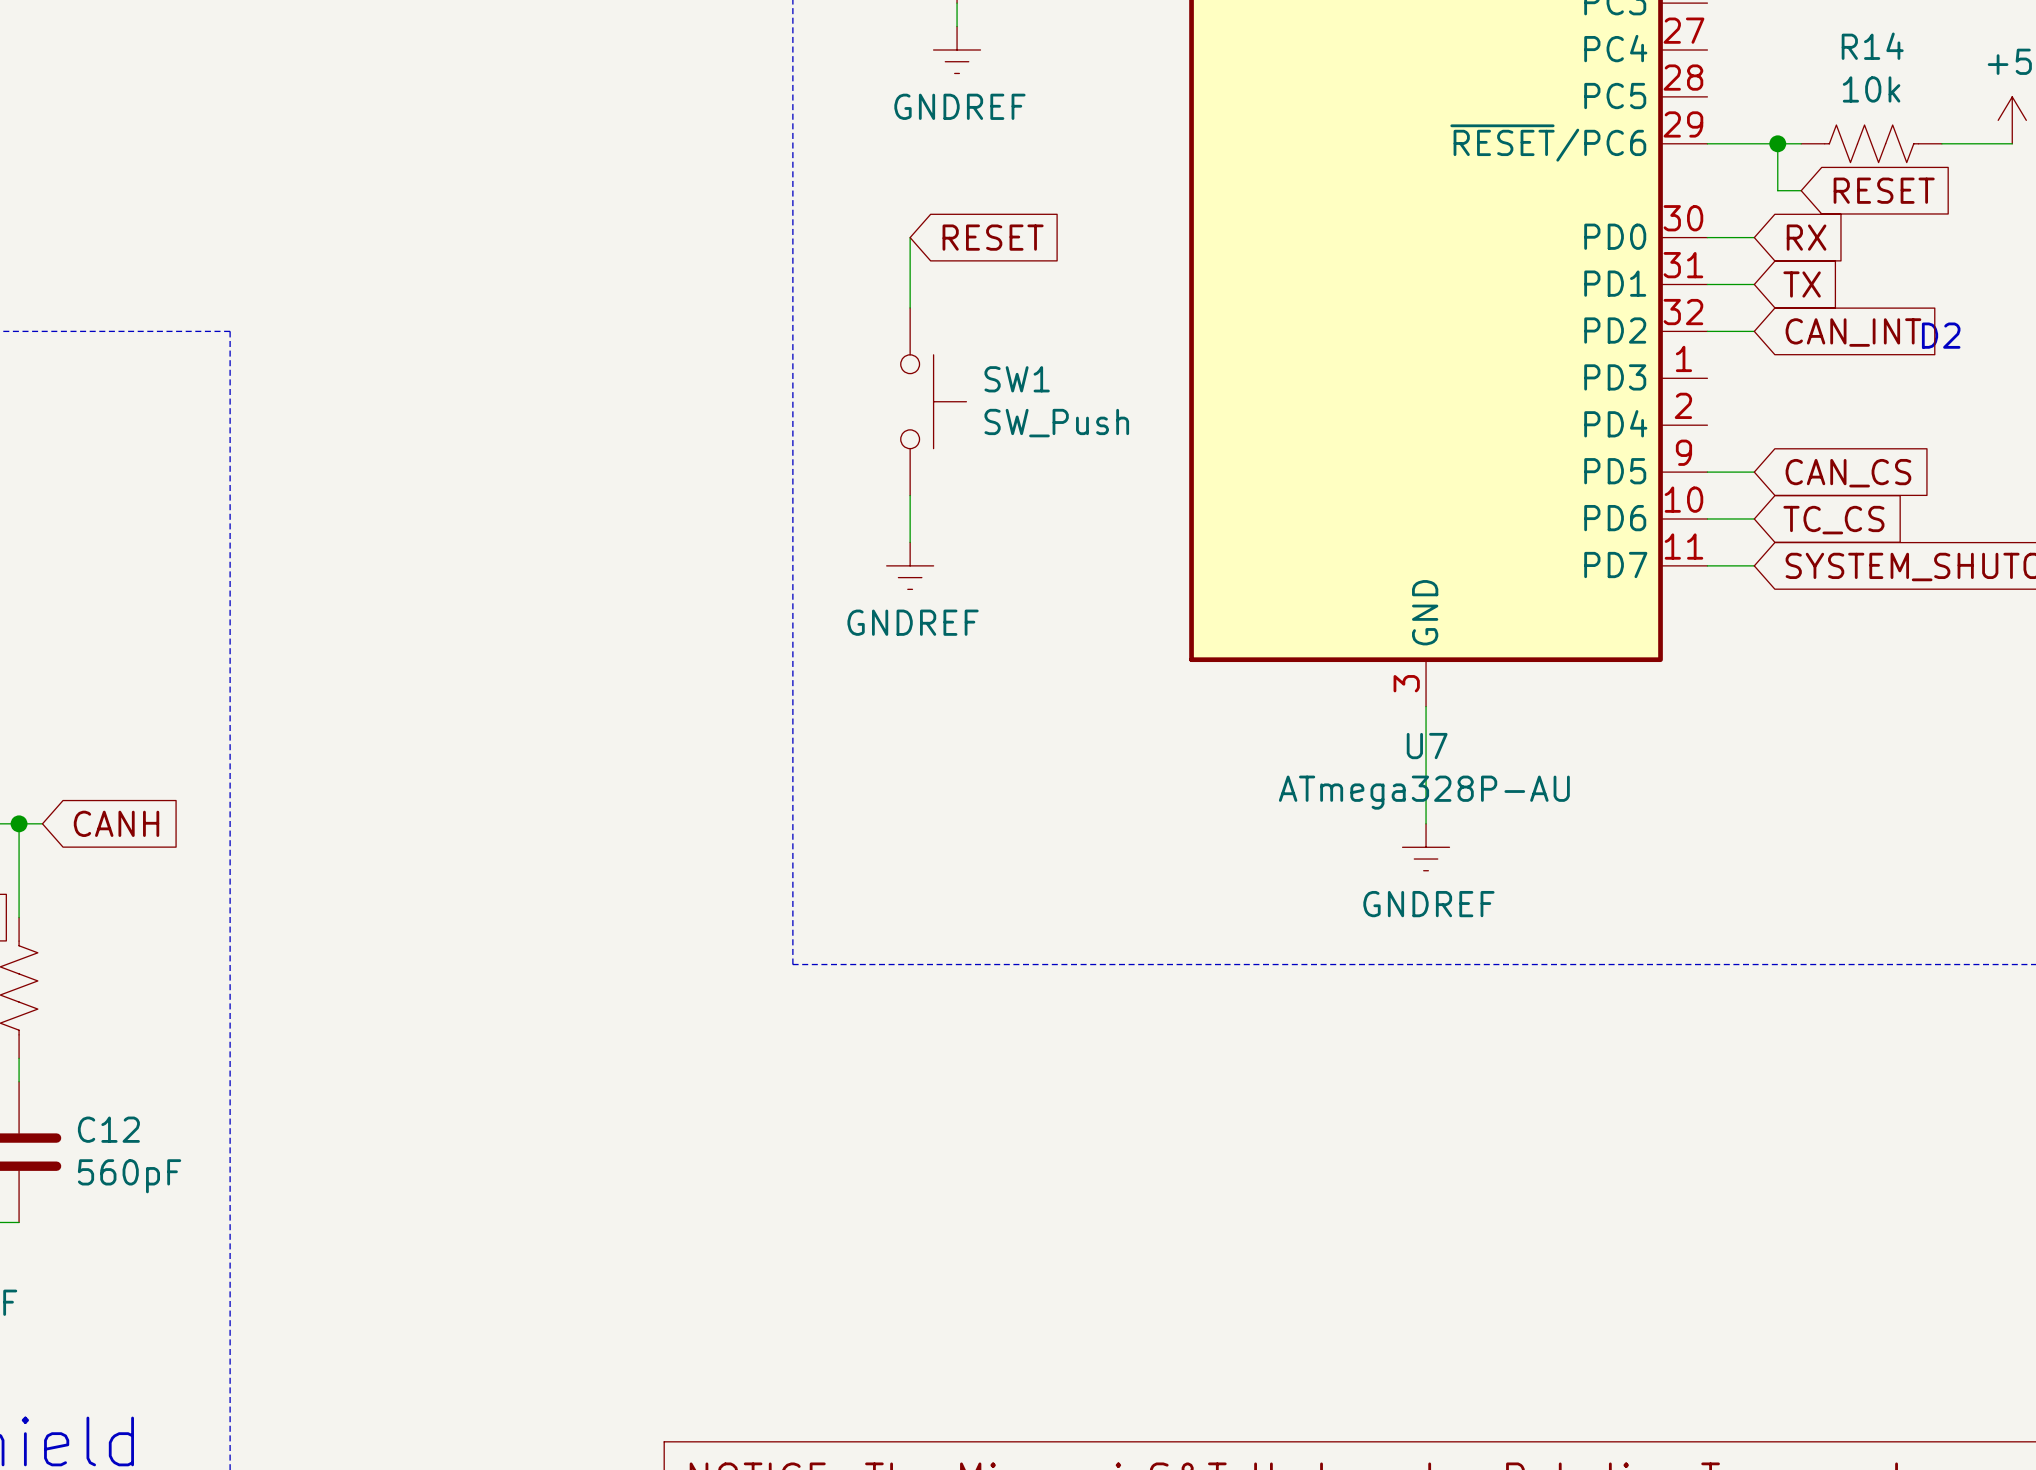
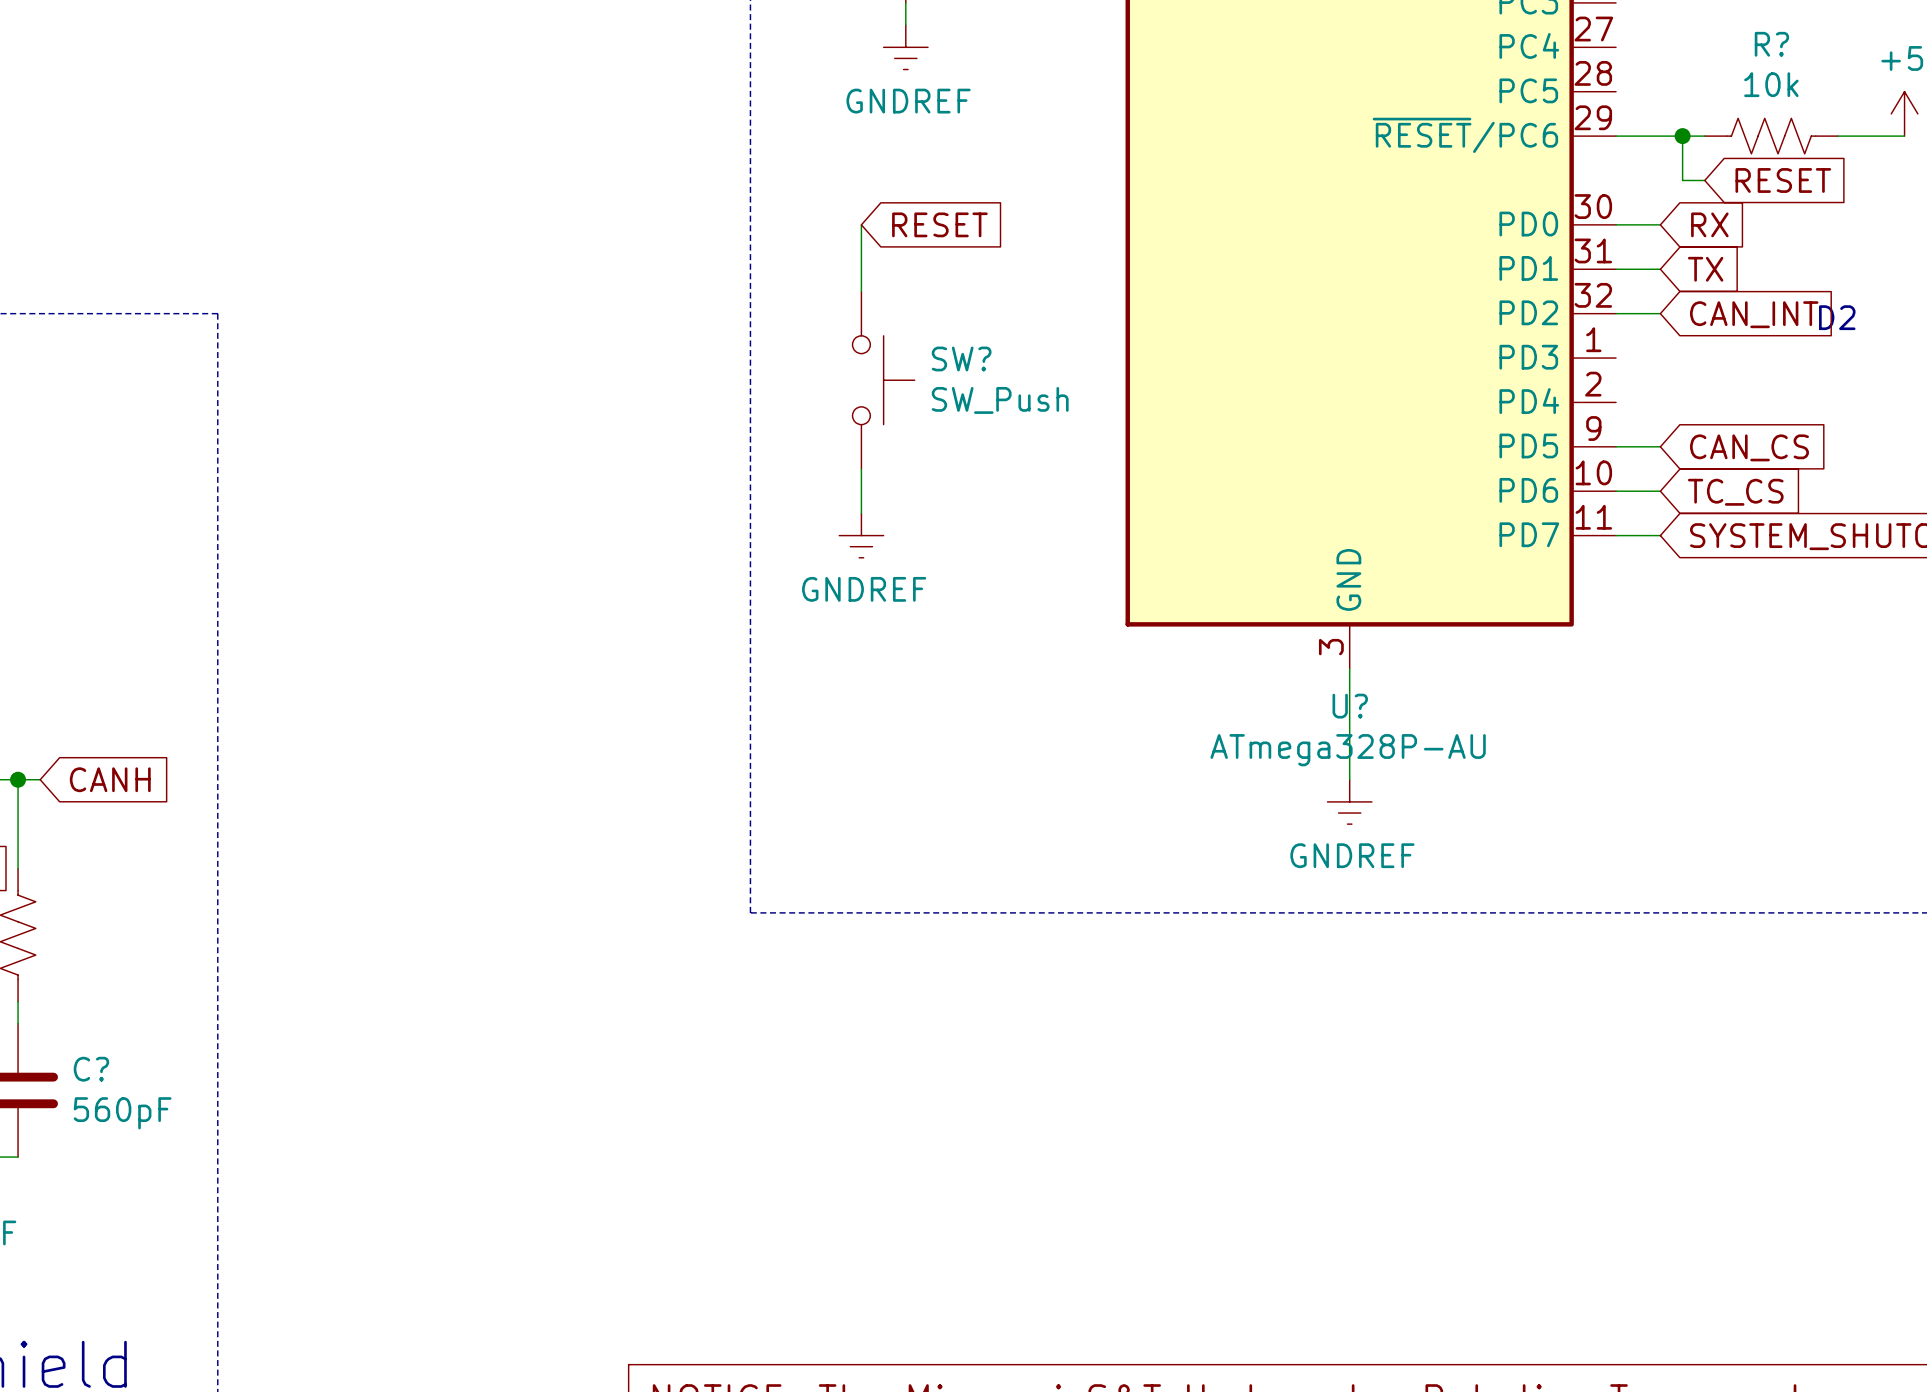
R14 name: R14 (1872, 46) -> R? (1771, 44)
SW1 name: SW1 (1017, 379) -> SW? (961, 358)
U7 name: U7 (1427, 746) -> U? (1350, 706)
C12 name: C12 (108, 1129) -> C? (91, 1069)

